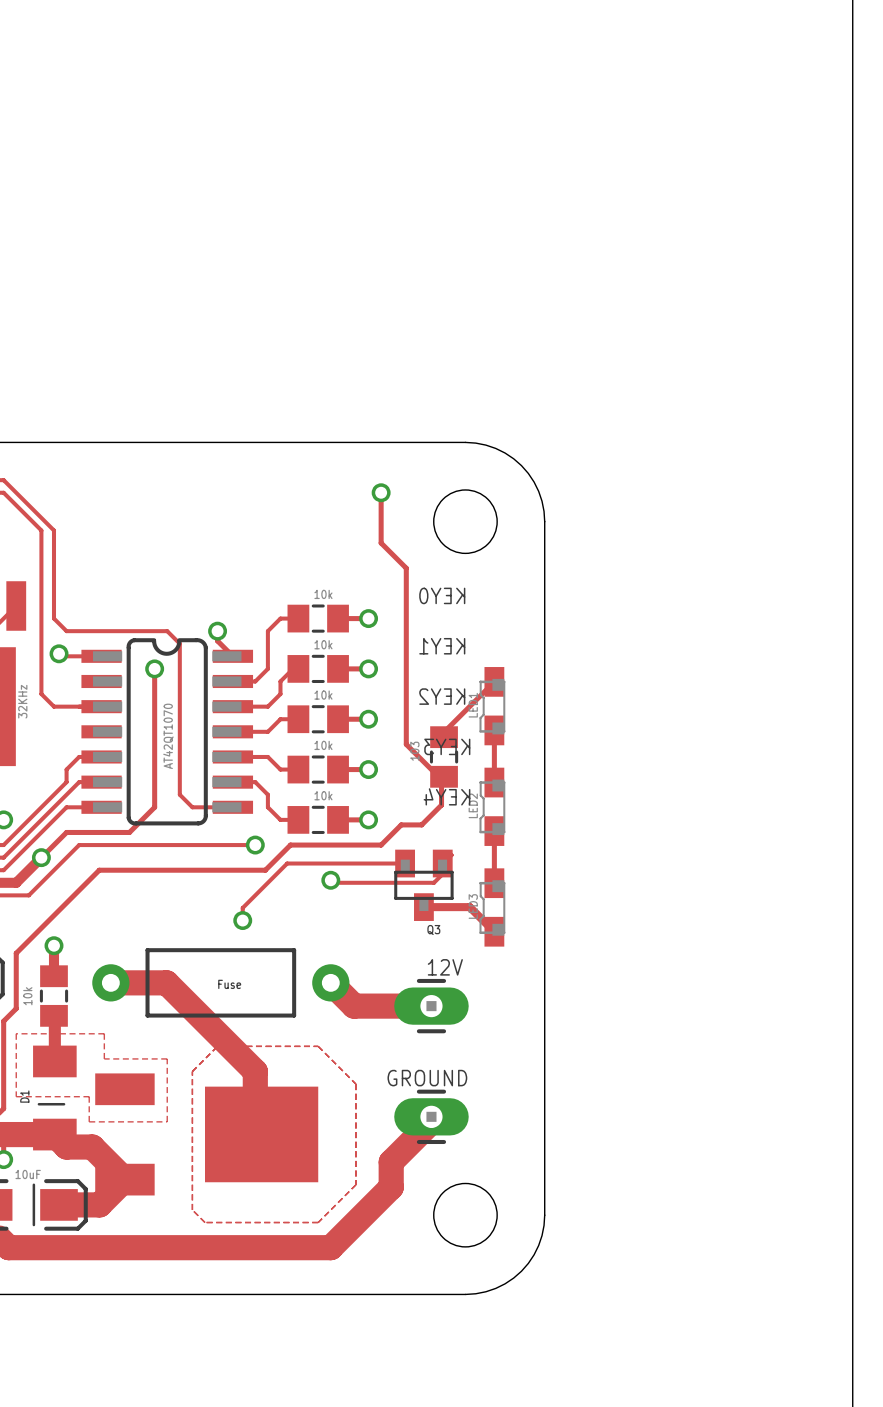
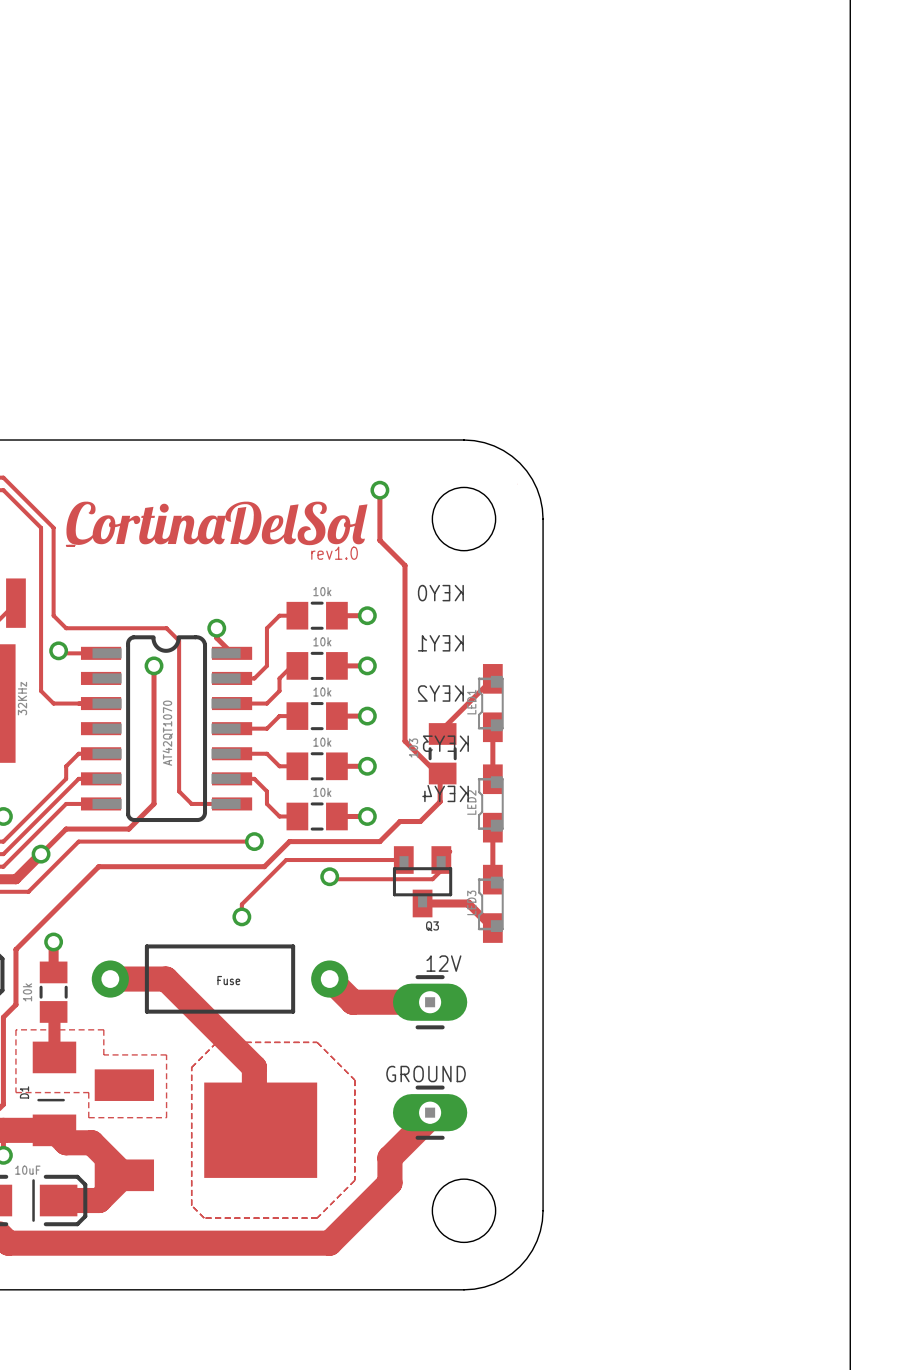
drawing: none -> [66, 483, 518, 546]
text: none -> rev1.0 (334, 553)

